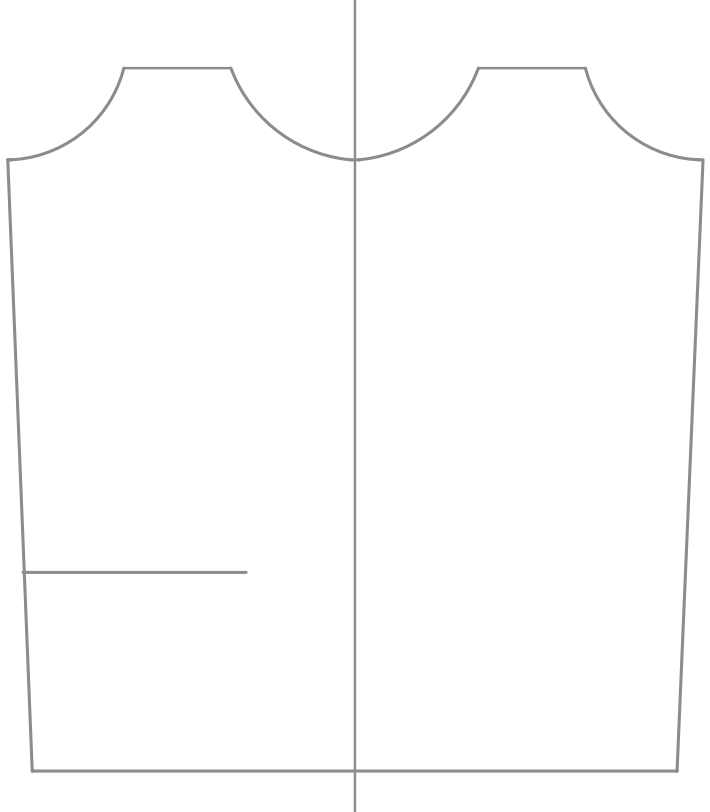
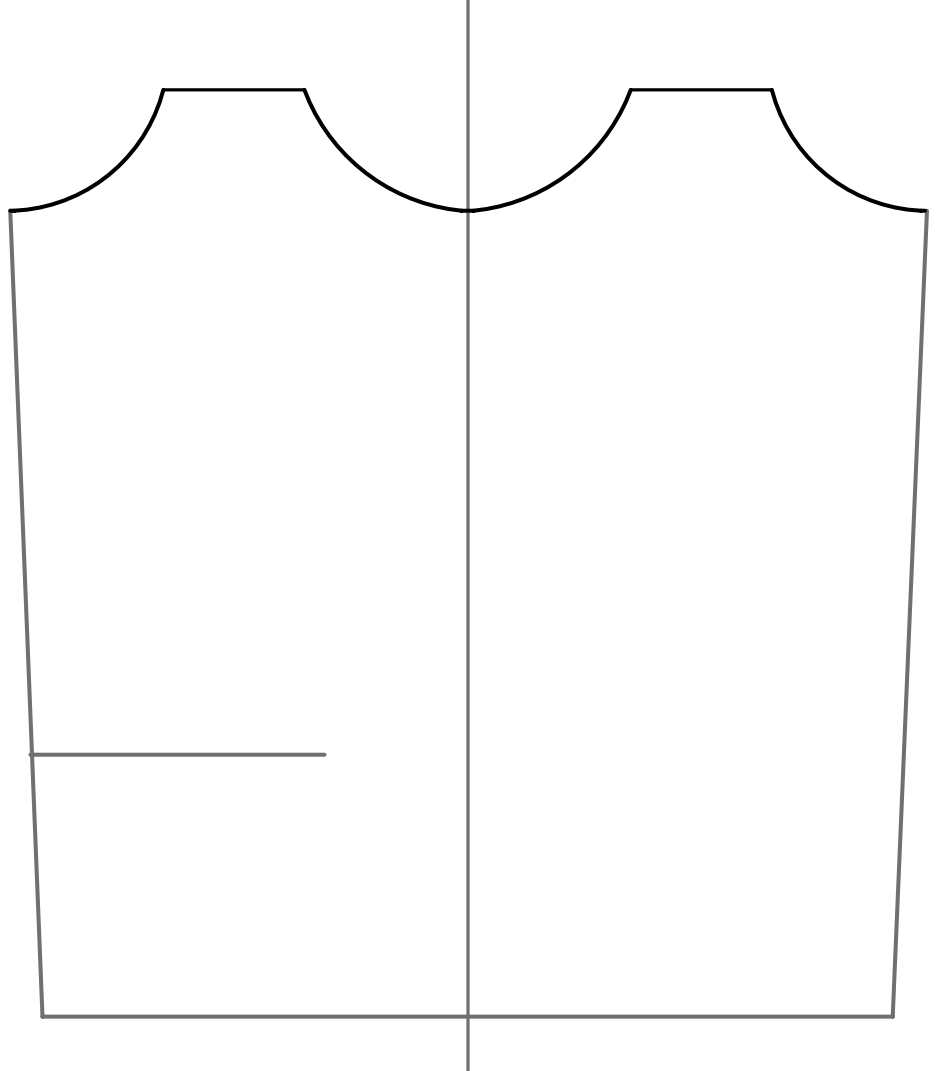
line: (7, 159) (30, 157) (48, 151) (66, 143) (82, 132) (96, 119) (108, 103) (117, 86) (123, 68) (230, 68) (249, 102) (277, 131) (311, 150) (350, 159) (369, 158) (388, 153) (423, 136) (439, 124) (459, 102) (478, 68) (585, 68) (591, 86) (600, 103) (612, 119) (626, 132) (642, 143) (660, 151) (679, 157) (701, 159) -> none
board edge: none -> (10, 210) (39, 207) (64, 200) (87, 189) (108, 174) (127, 157) (142, 136) (155, 114) (163, 89) (304, 89) (315, 113) (329, 135) (346, 155) (365, 172) (387, 187) (410, 198) (435, 206) (461, 210) (486, 209) (511, 202) (536, 193) (558, 180) (579, 164) (606, 135) (620, 113) (630, 89) (771, 89) (780, 114) (792, 136) (807, 157) (826, 174) (847, 189) (870, 200) (895, 207) (924, 210)

